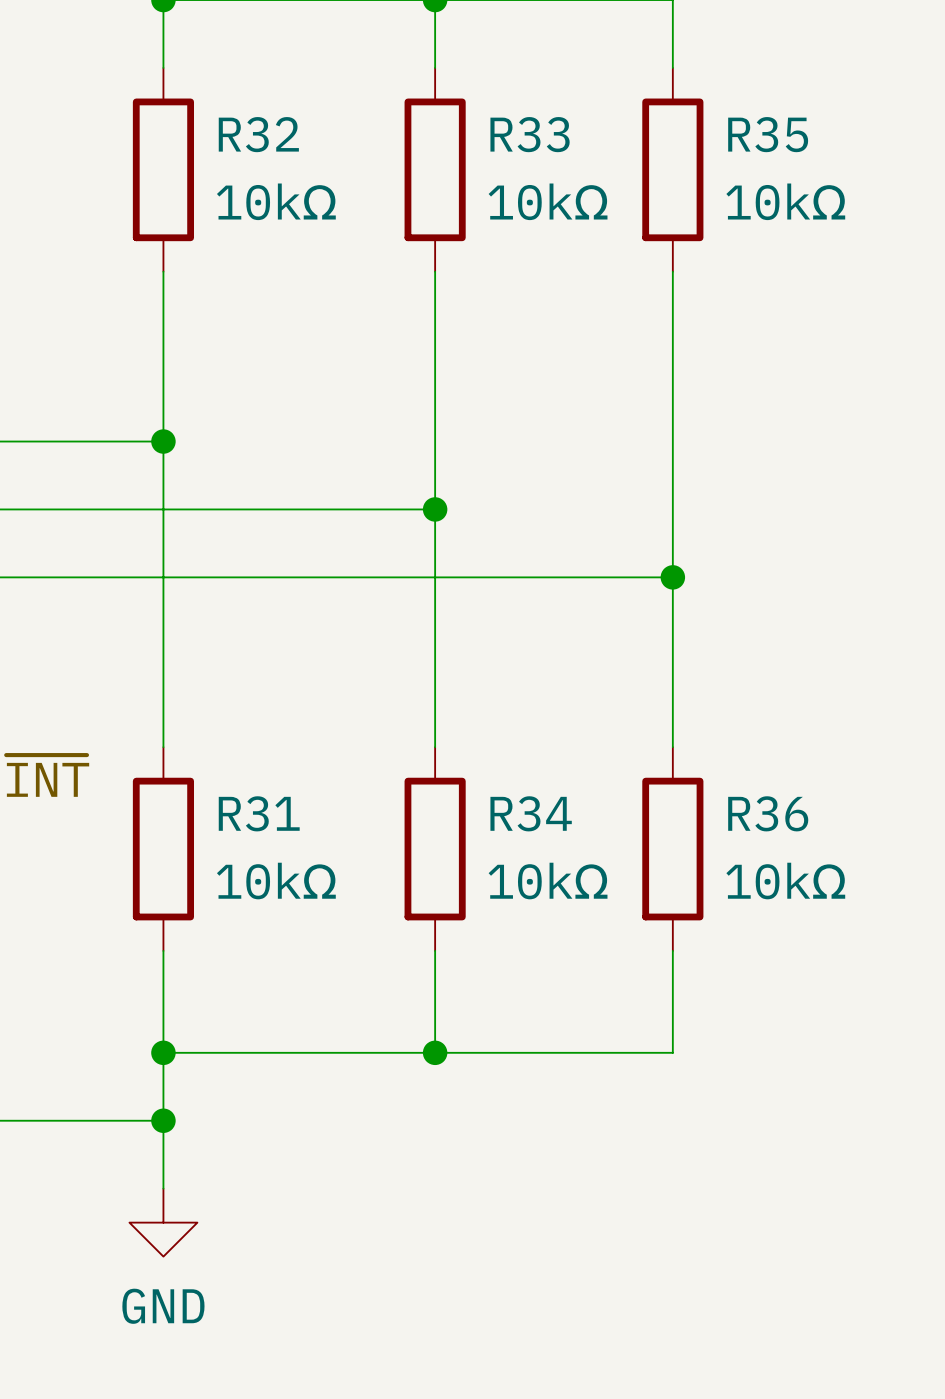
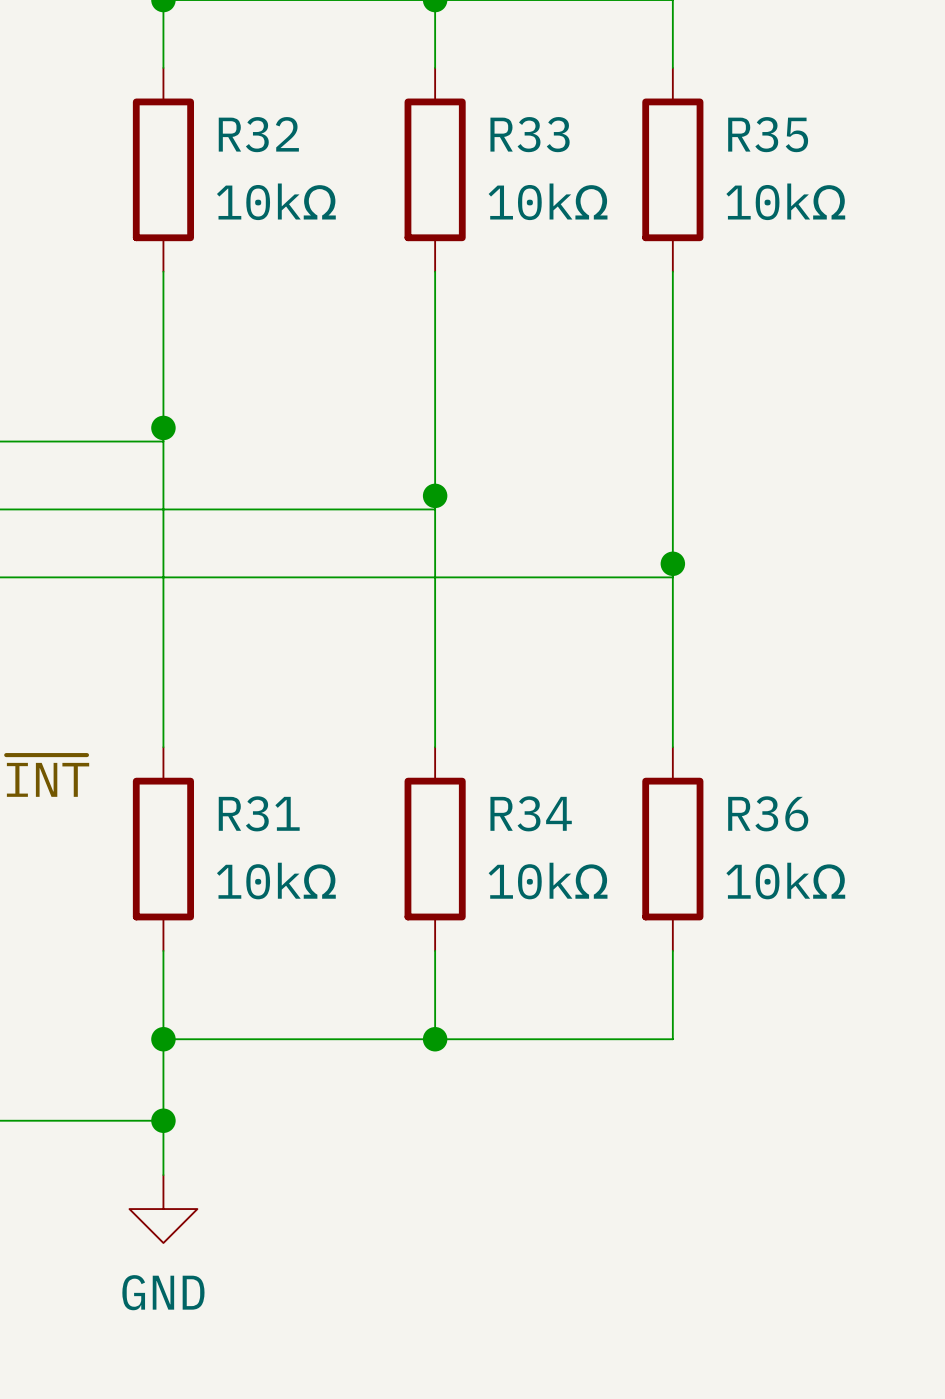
junction position: (163, 441) -> (163, 427)
junction position: (435, 509) -> (435, 495)
junction position: (672, 577) -> (672, 563)
wire: (672, 1039) (672, 1052) (163, 1052) -> (672, 1039) (163, 1039)
junction position: (163, 1052) -> (163, 1039)
junction position: (435, 1052) -> (435, 1039)
power symbol position: GND (163, 1222) -> GND (163, 1209)

